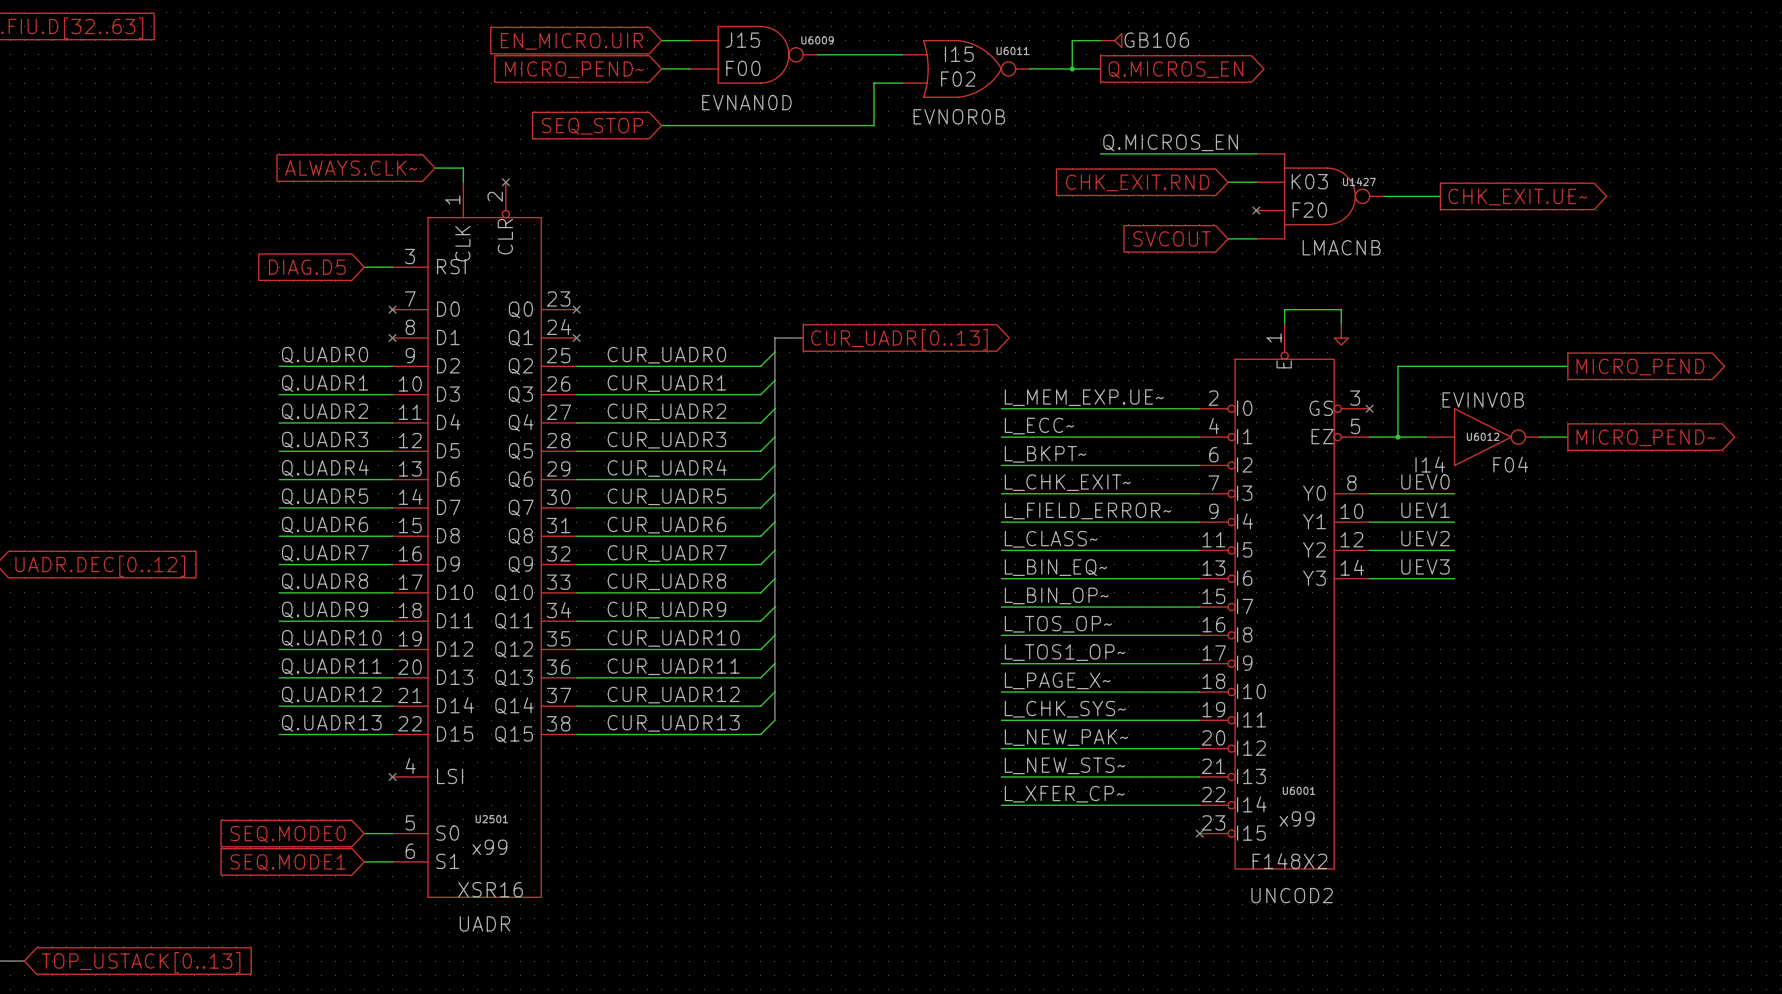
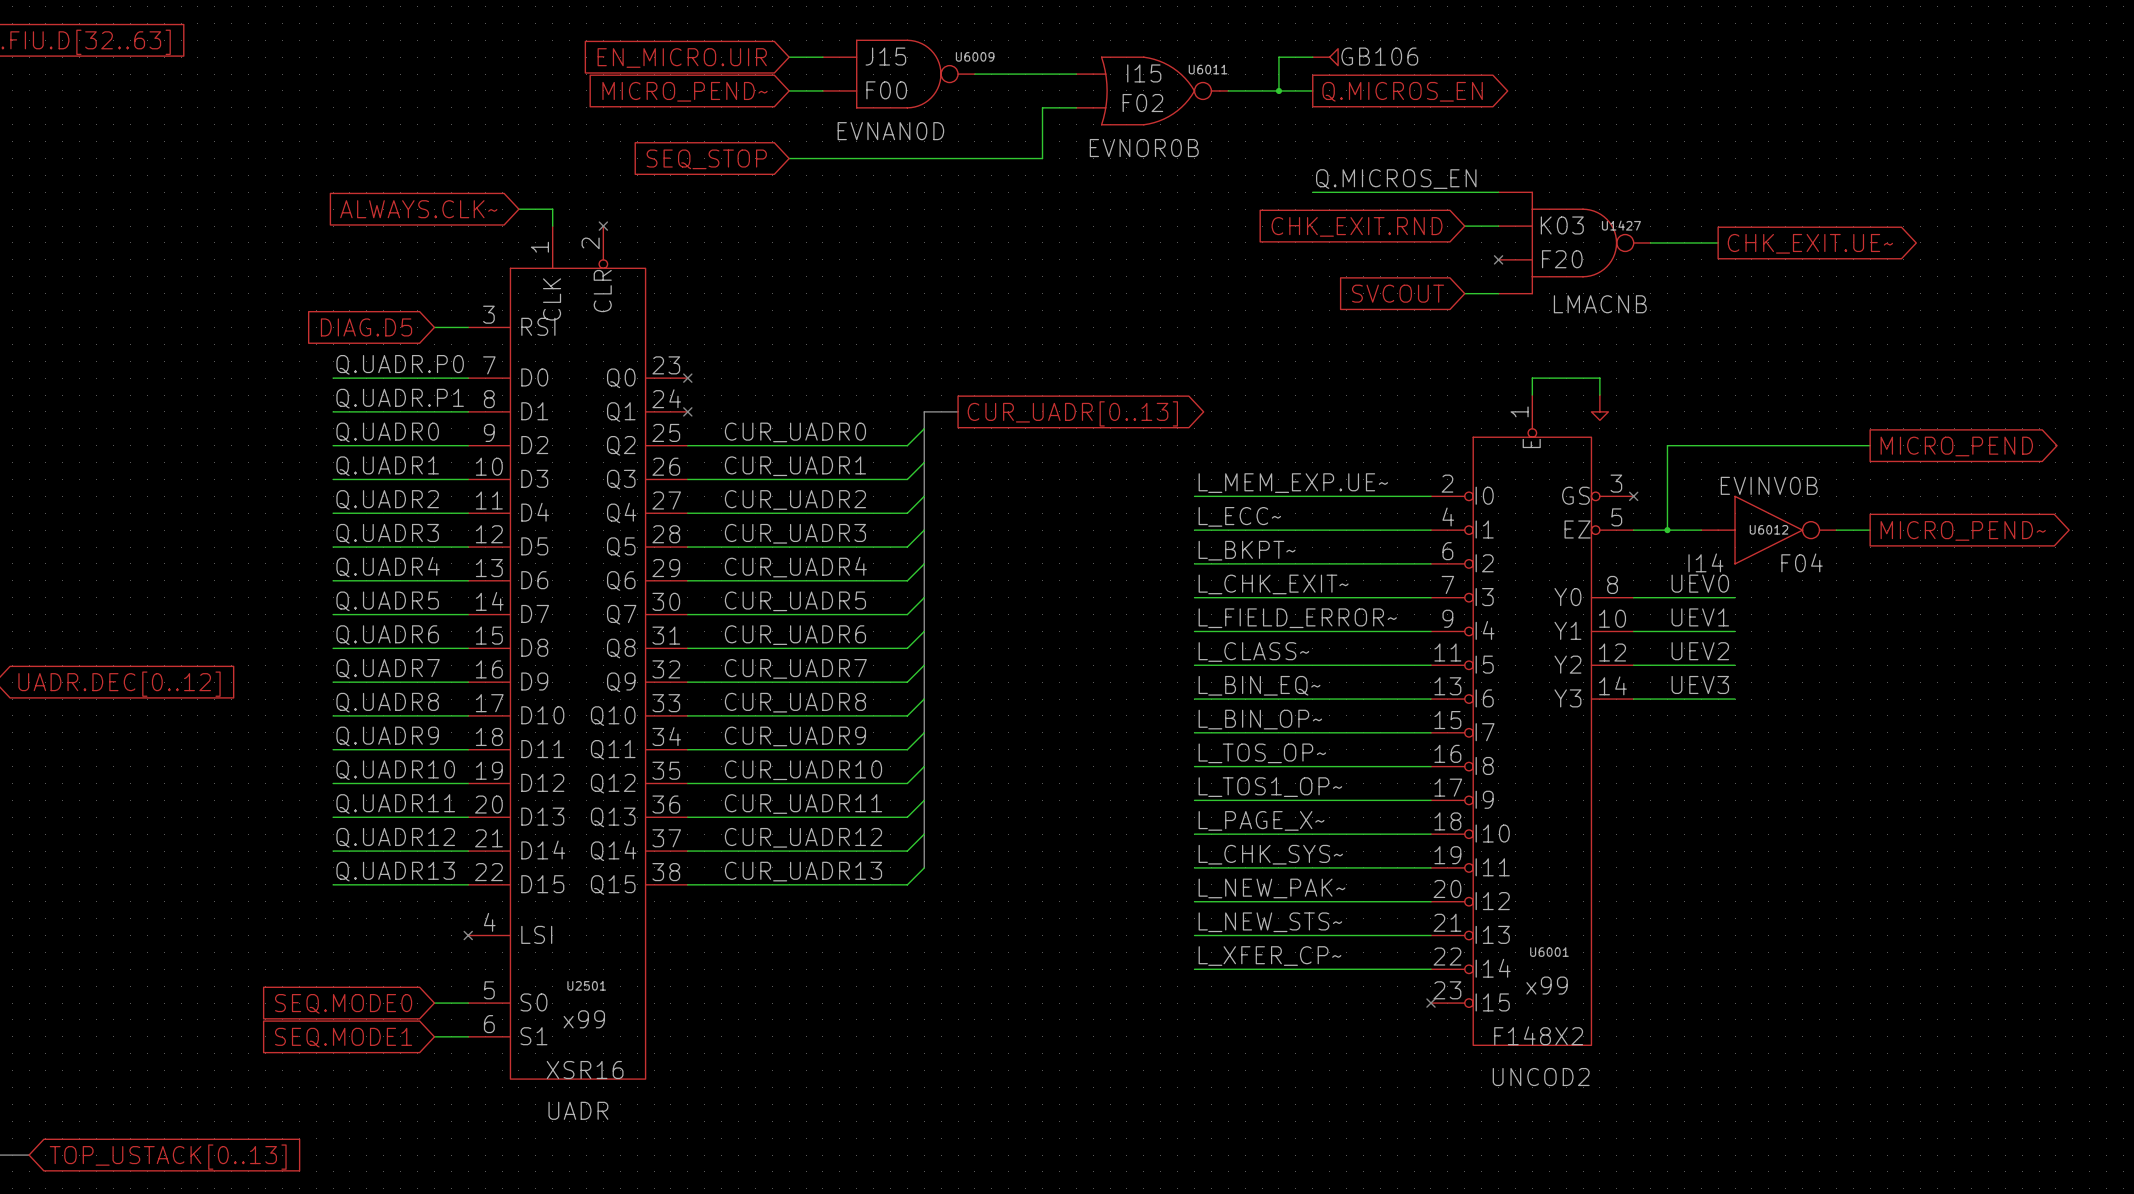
label: none -> Q.UADR.P0 (400, 364)
wire: none -> (333, 378) (468, 378)
no-connect mark: (392, 309) -> none
label: none -> Q.UADR.P1 (400, 398)
wire: none -> (333, 411) (468, 411)
no-connect mark: (392, 337) -> none

